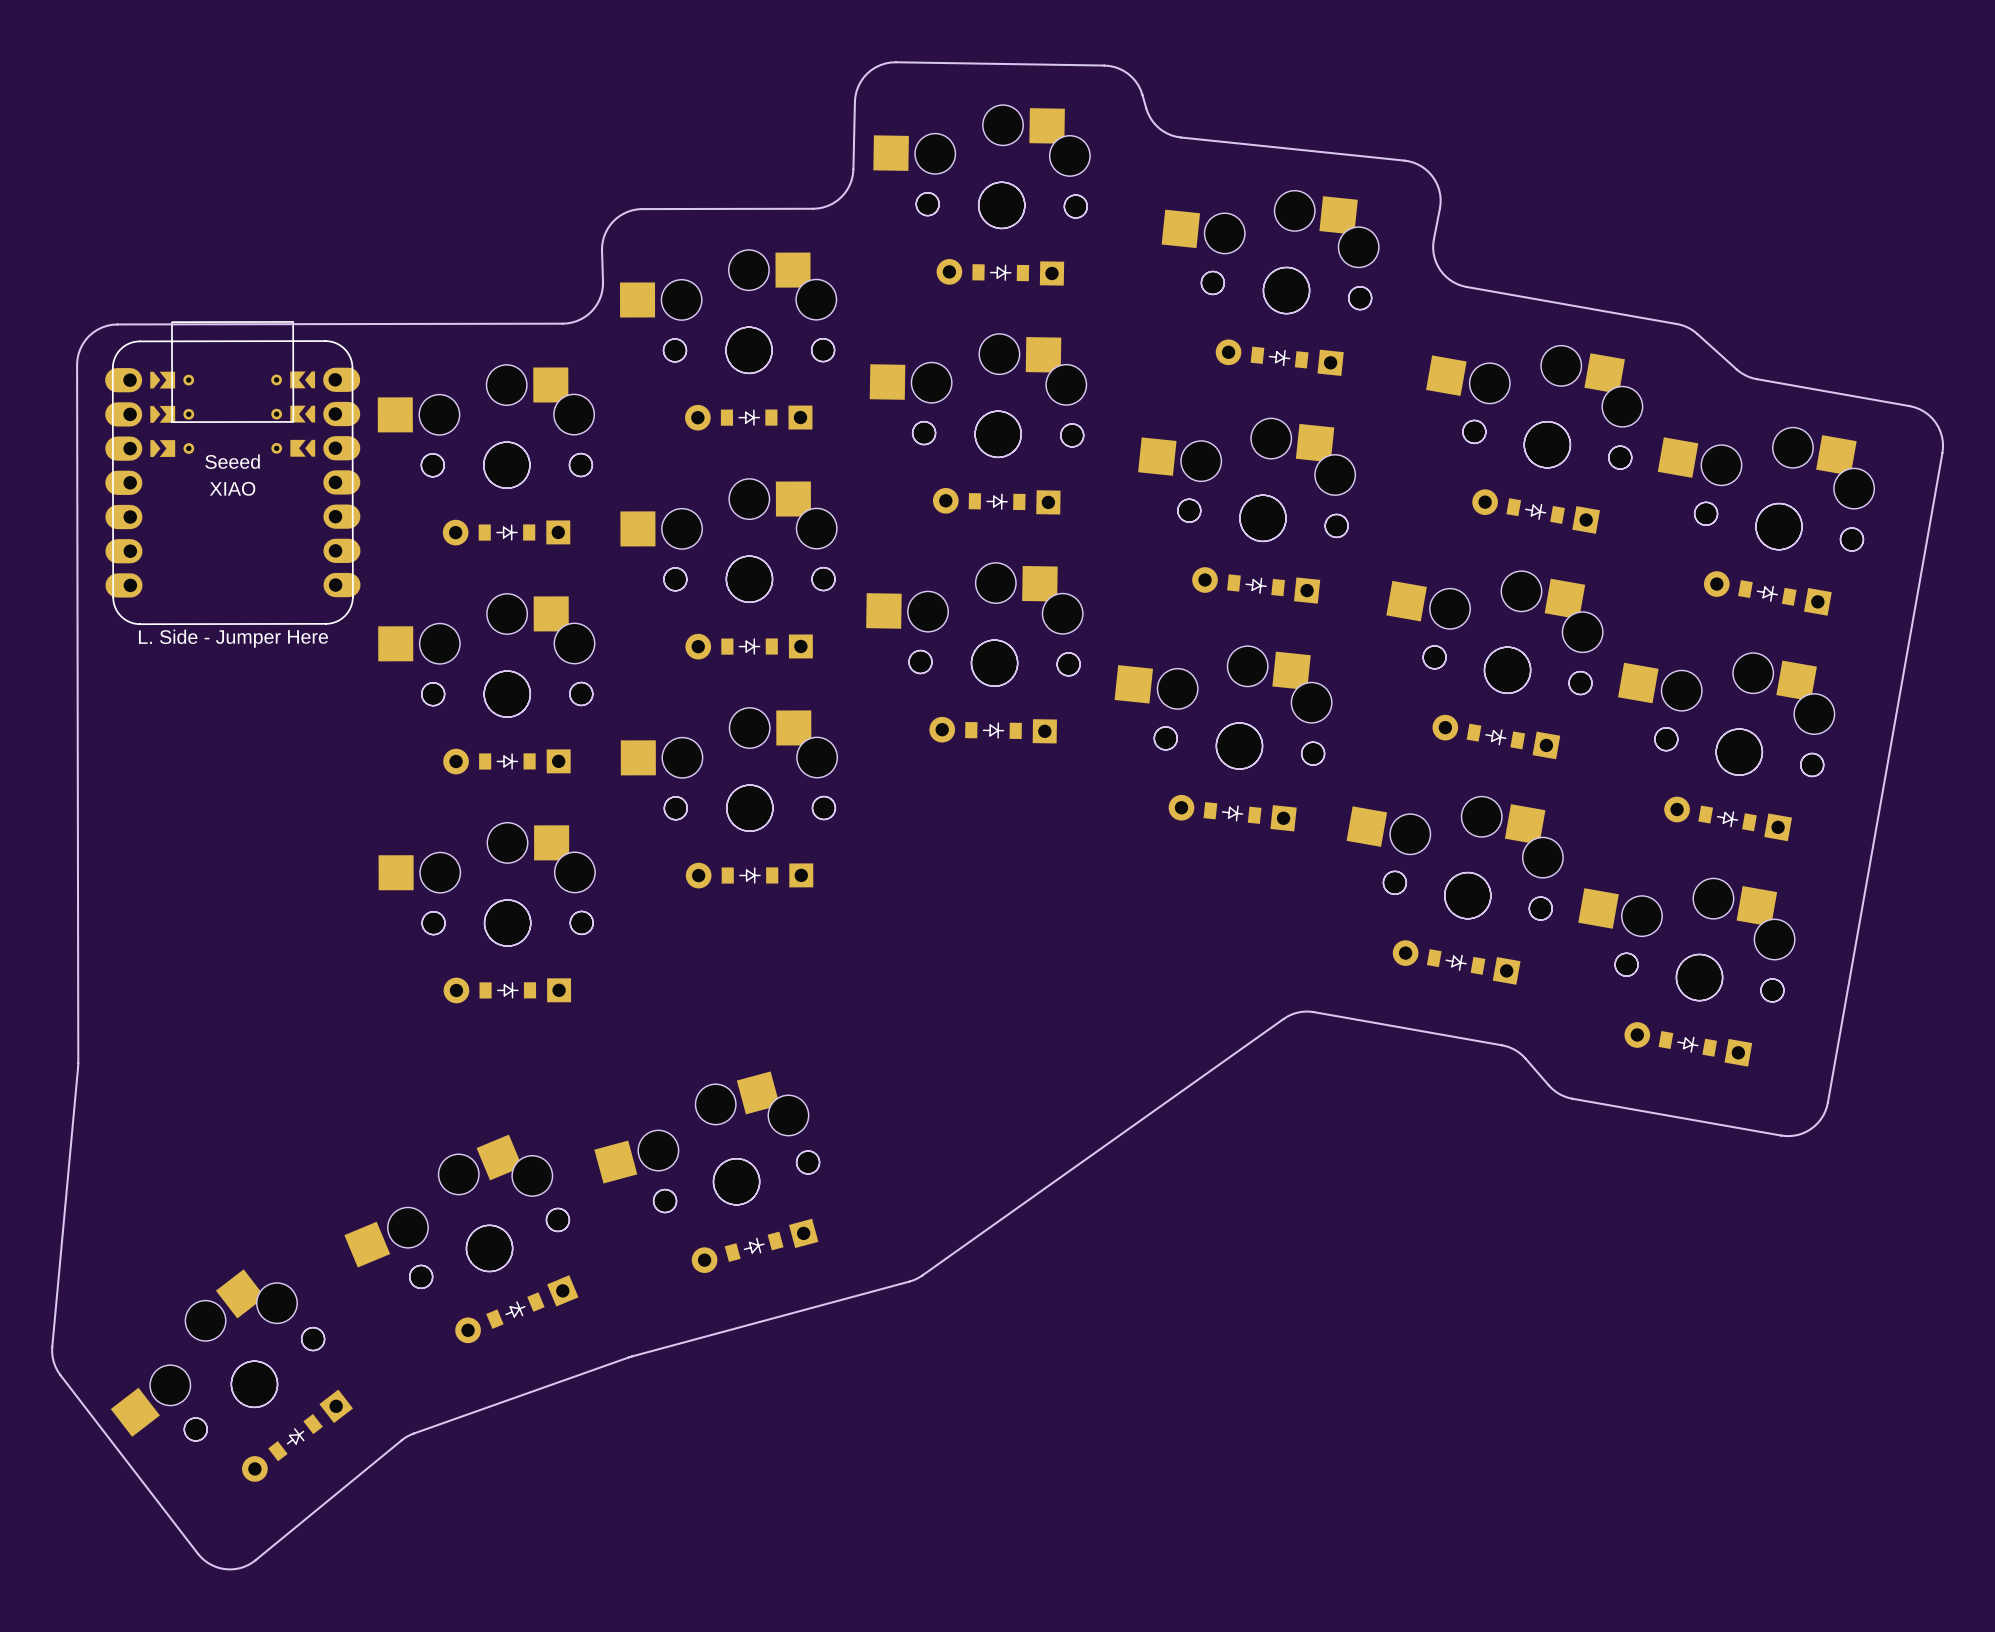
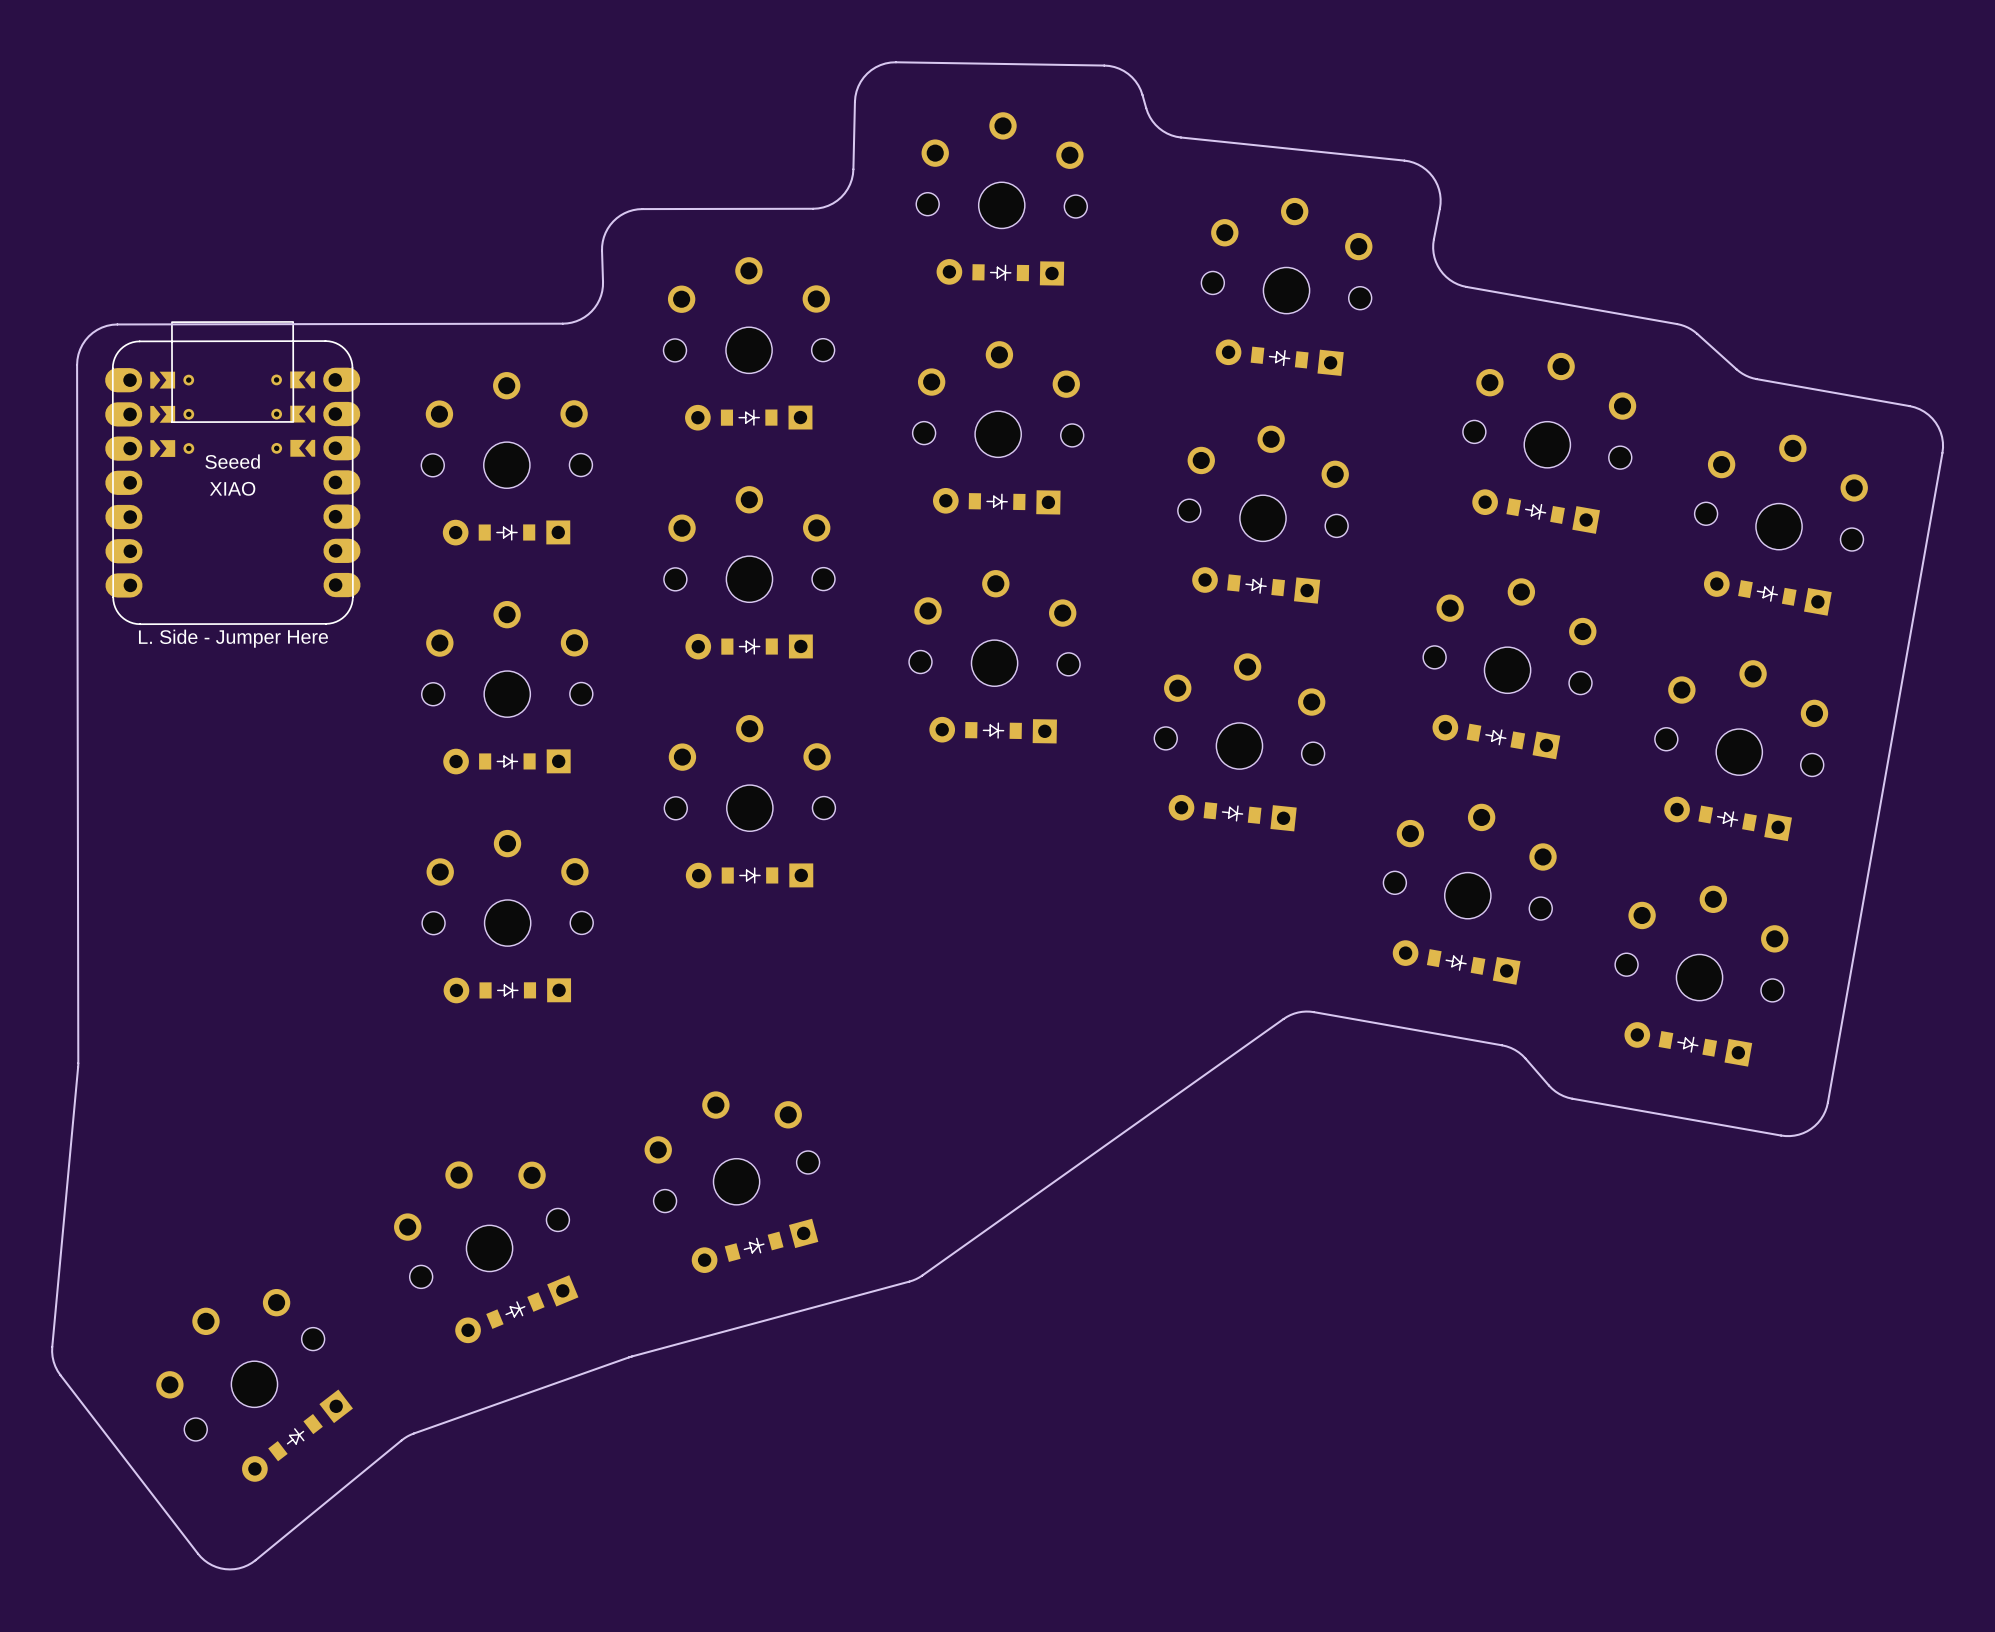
part: (981, 166) -> none
part: (1270, 252) -> none
part: (728, 311) -> none
part: (978, 395) -> none
part: (1534, 407) -> none
part: (486, 426) -> none
part: (1246, 479) -> none
part: (1766, 489) -> none
part: (728, 540) -> none
part: (974, 624) -> none
part: (1494, 632) -> none
part: (486, 655) -> none
part: (1223, 707) -> none
part: (1726, 714) -> none
part: (729, 769) -> none
part: (1454, 858) -> none
part: (486, 884) -> none
part: (1686, 940) -> none
part: (706, 1141) -> none
part: (456, 1211) -> none
part: (217, 1355) -> none

